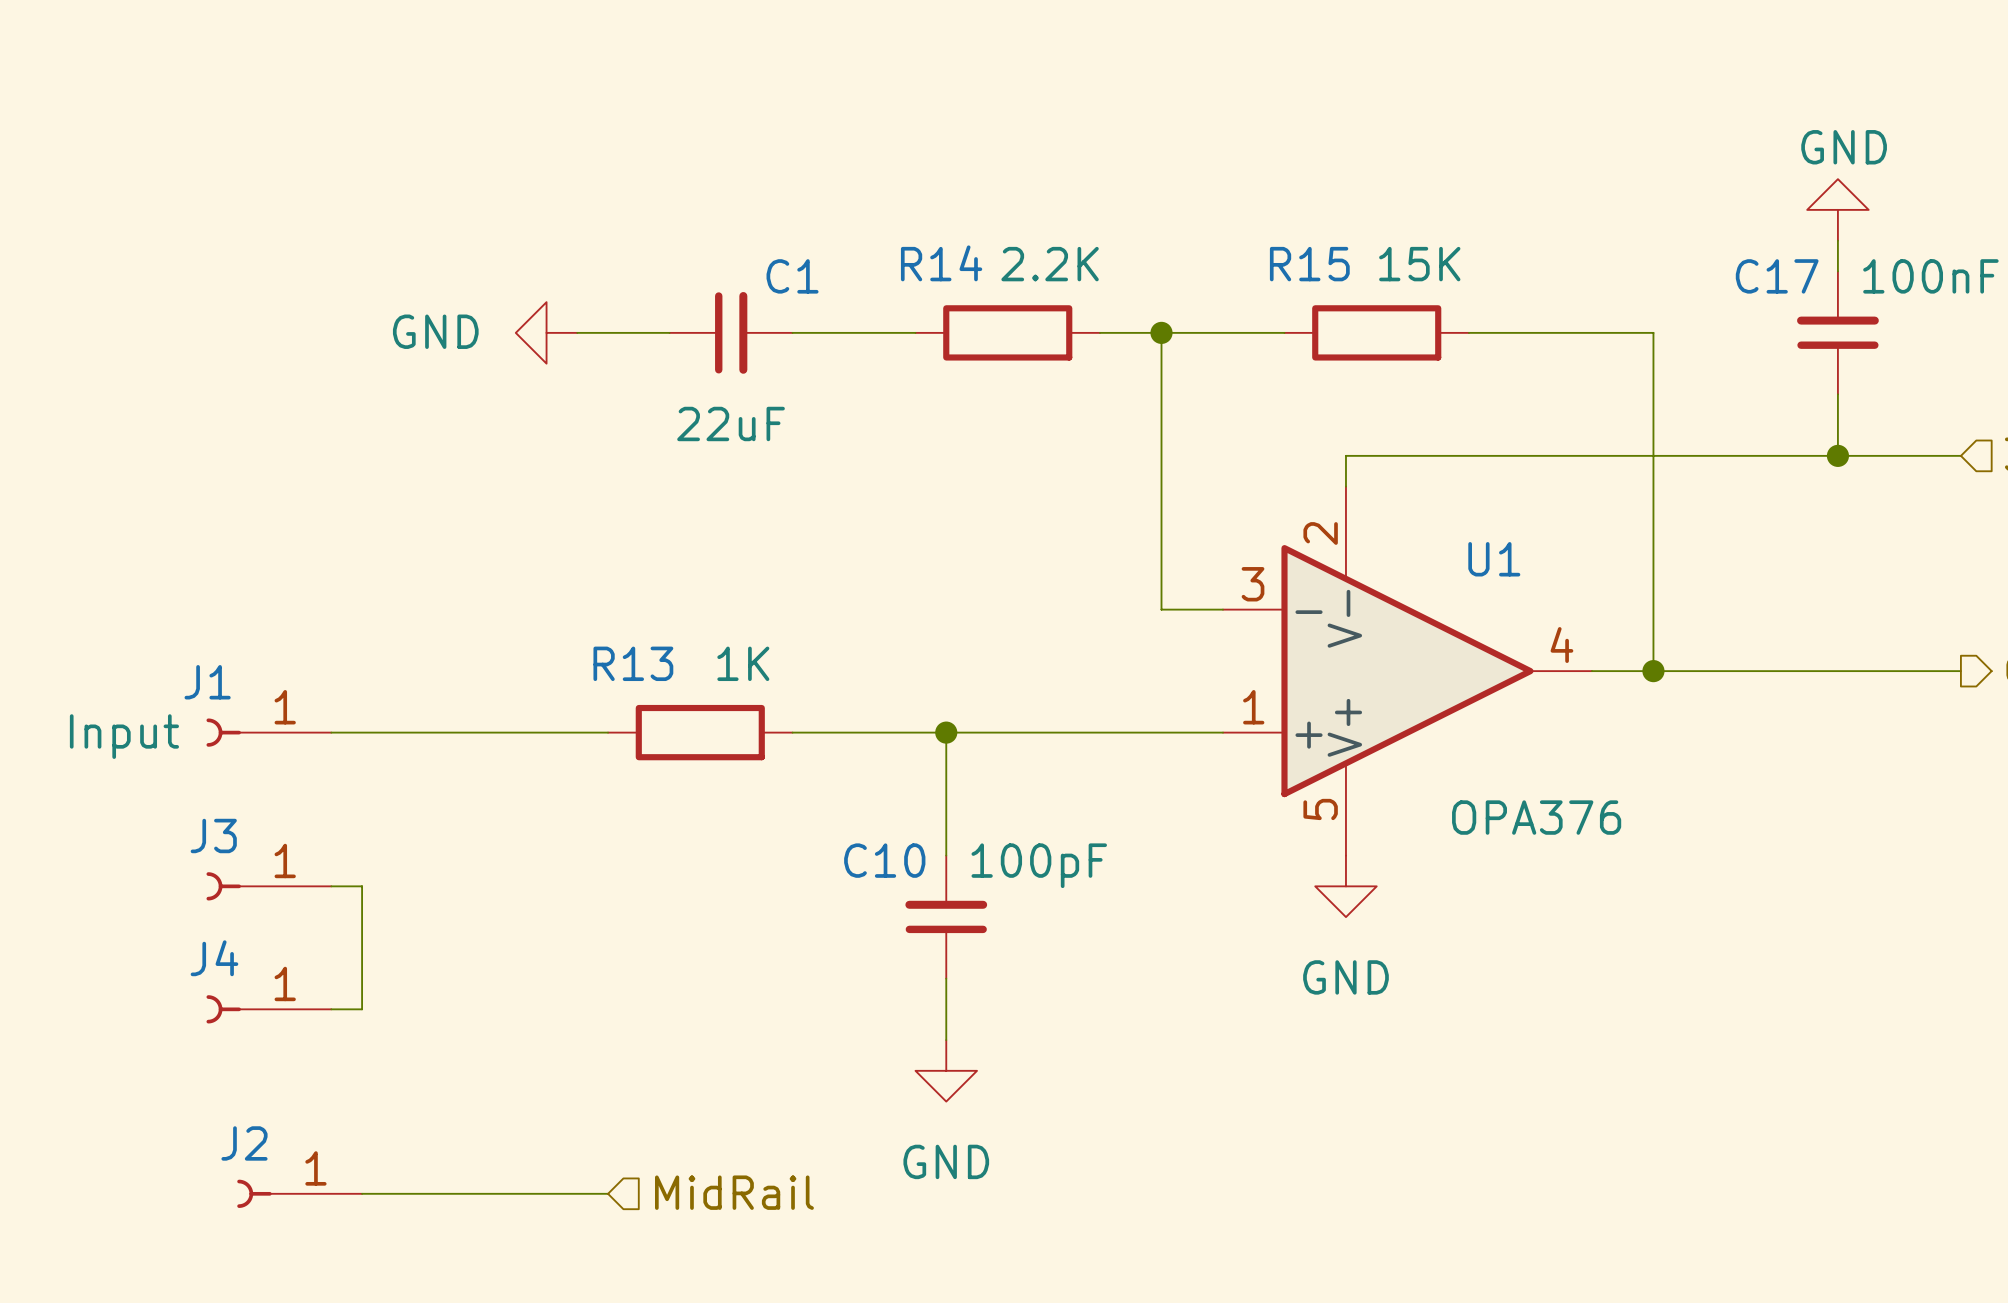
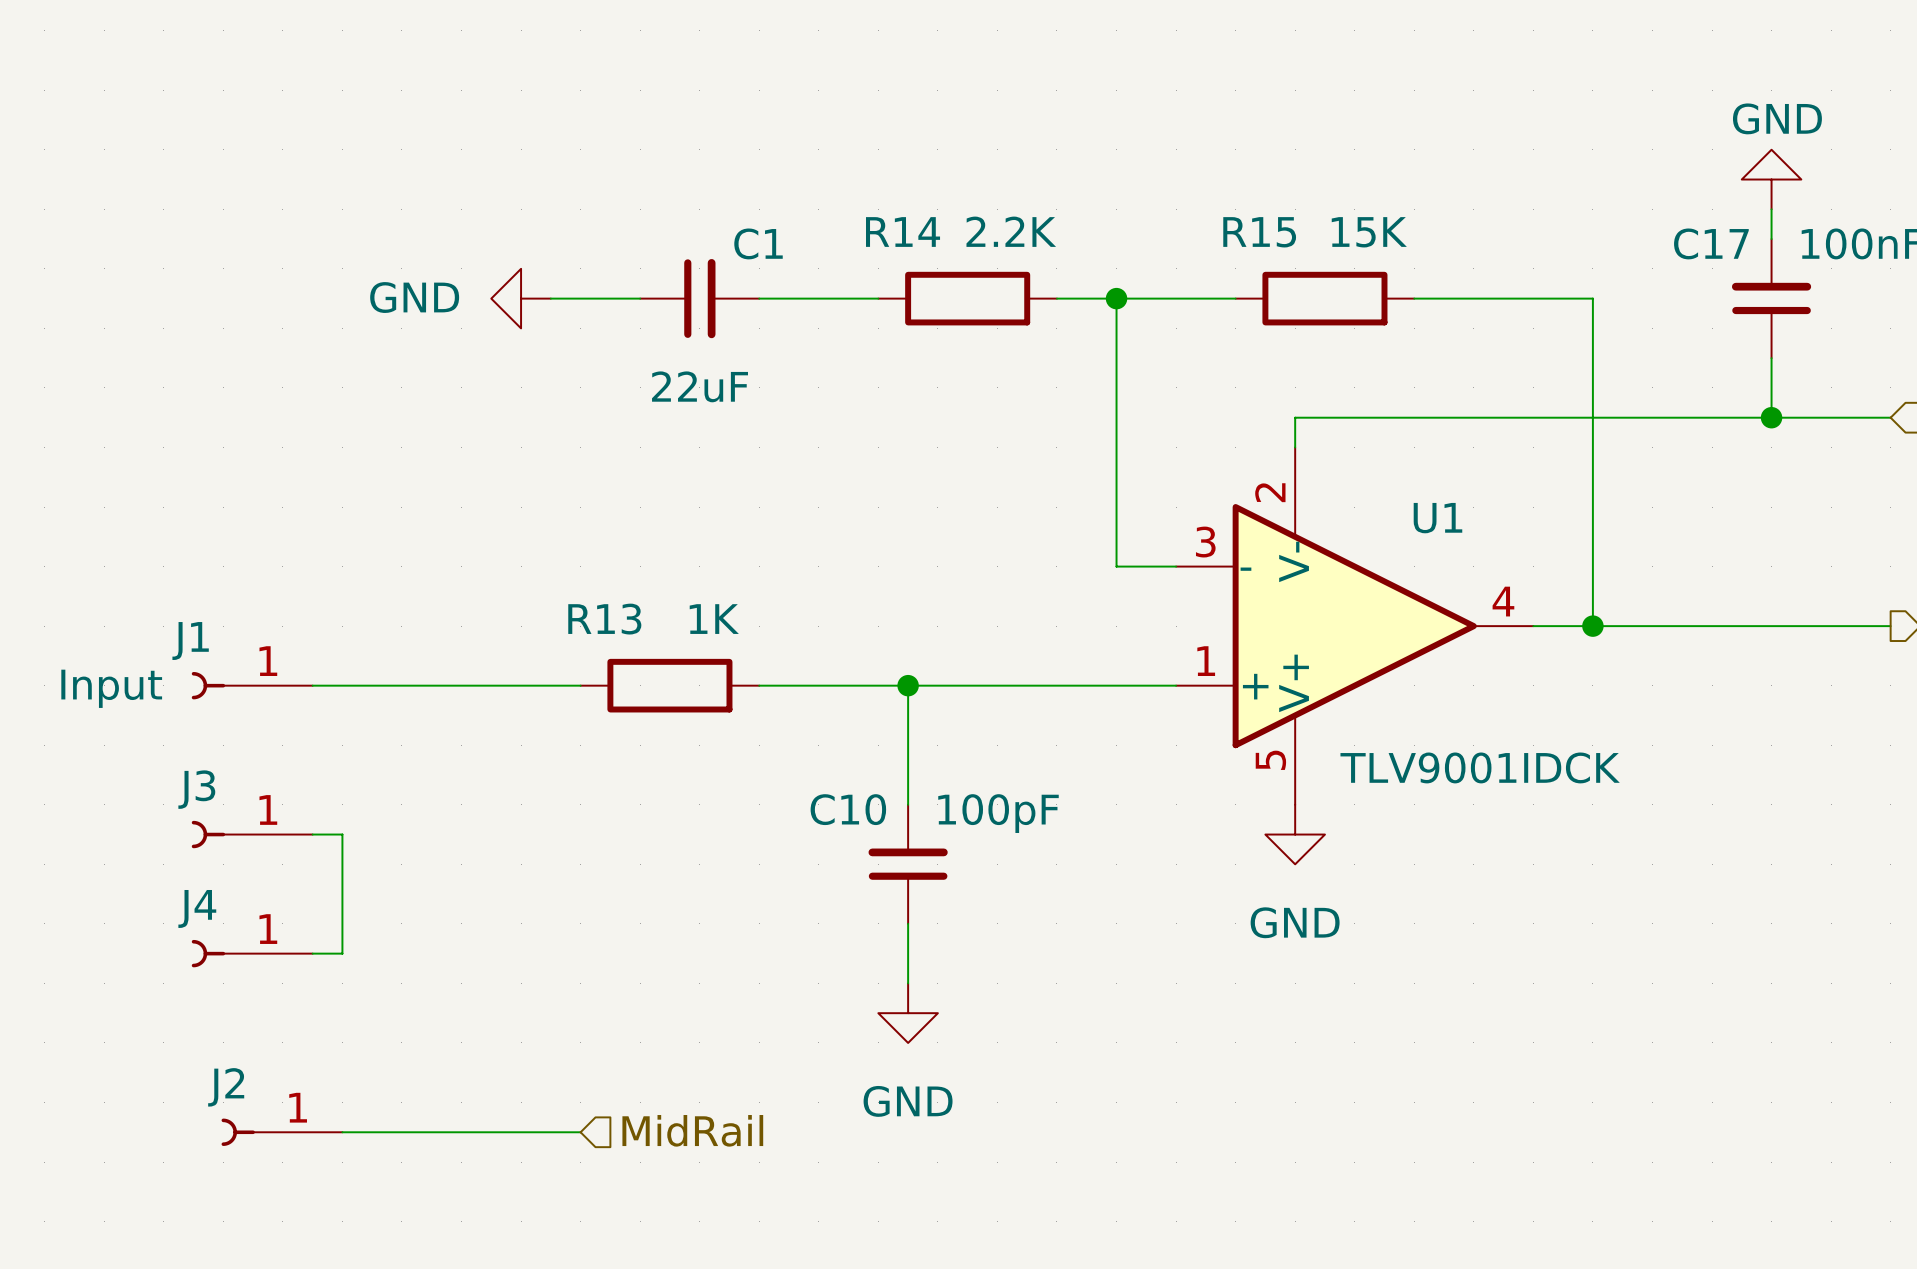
U1 value: OPA376 (1536, 817) -> TLV9001IDCK (1480, 767)

